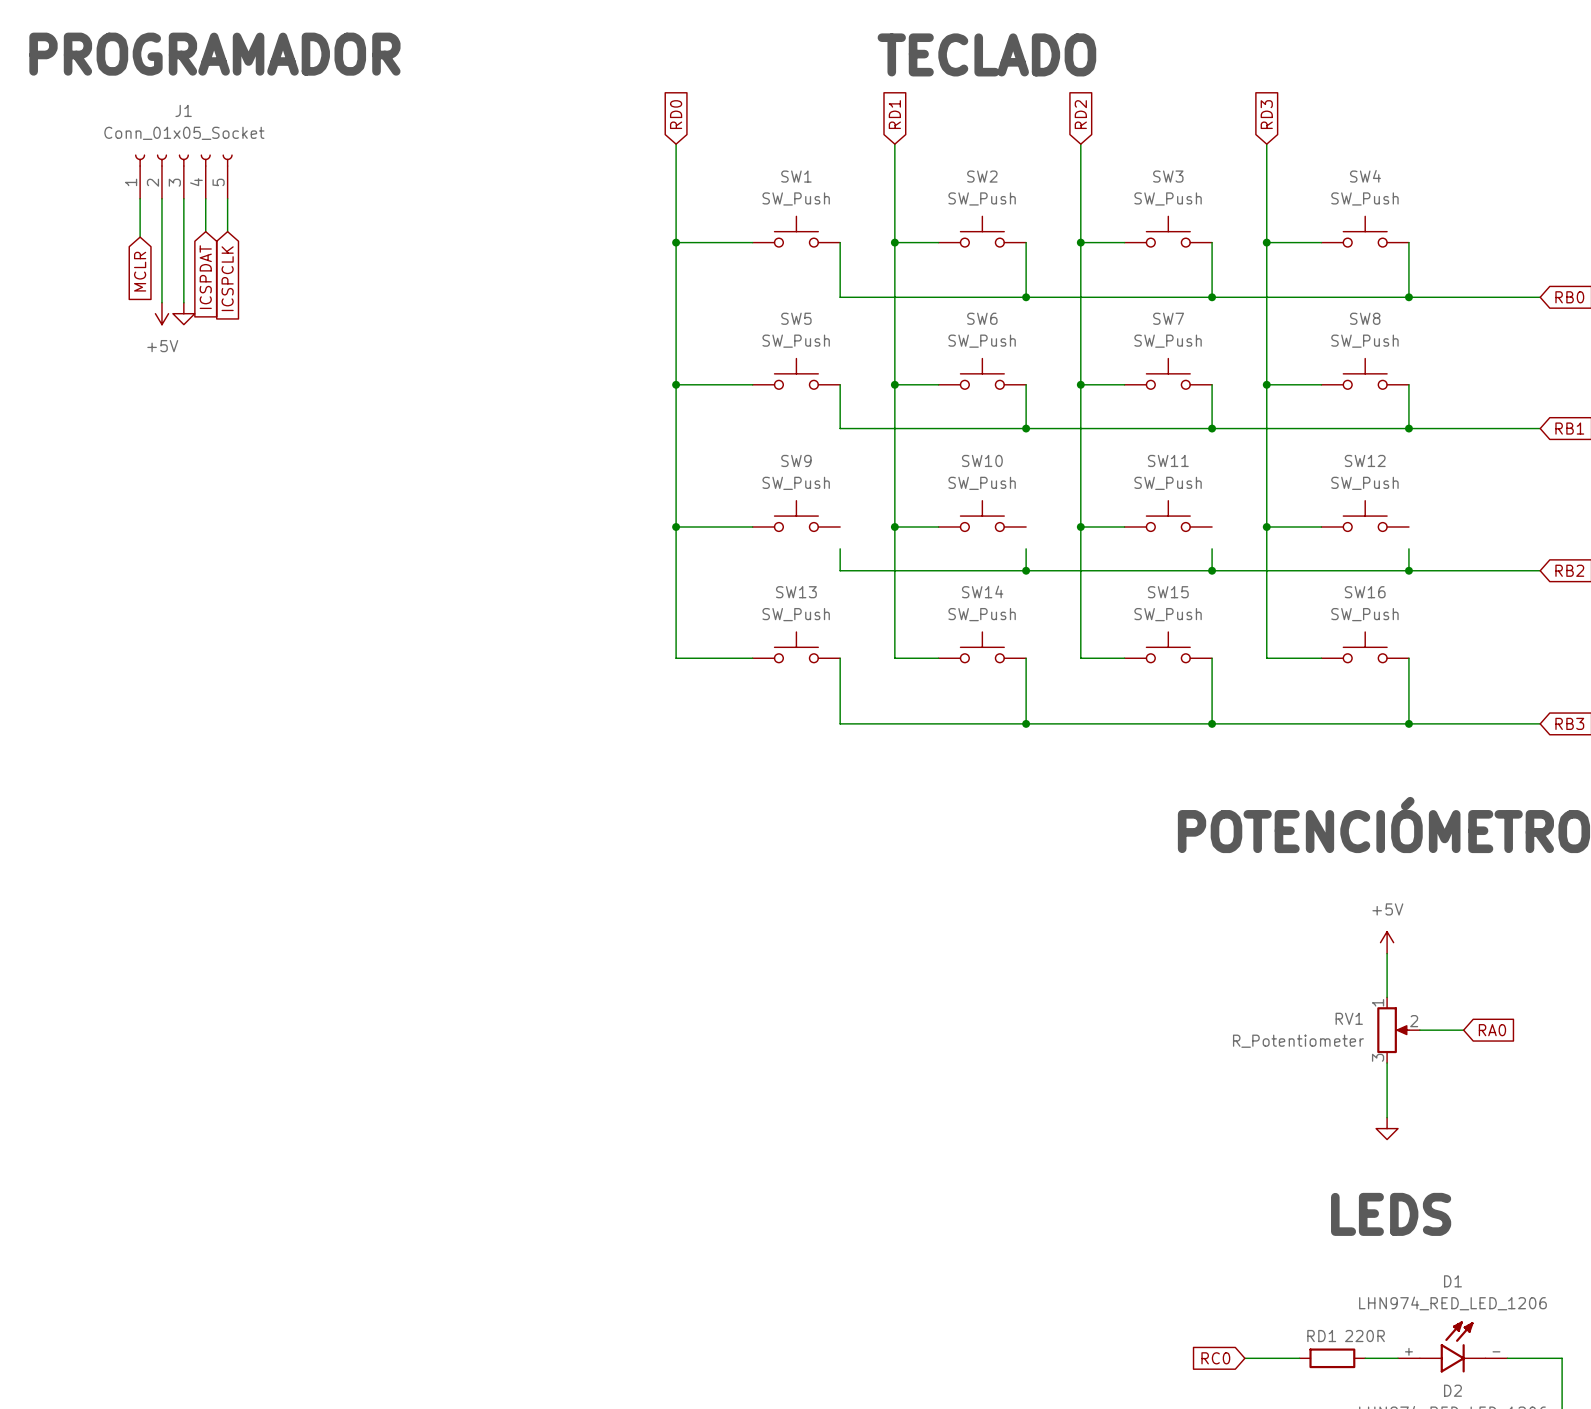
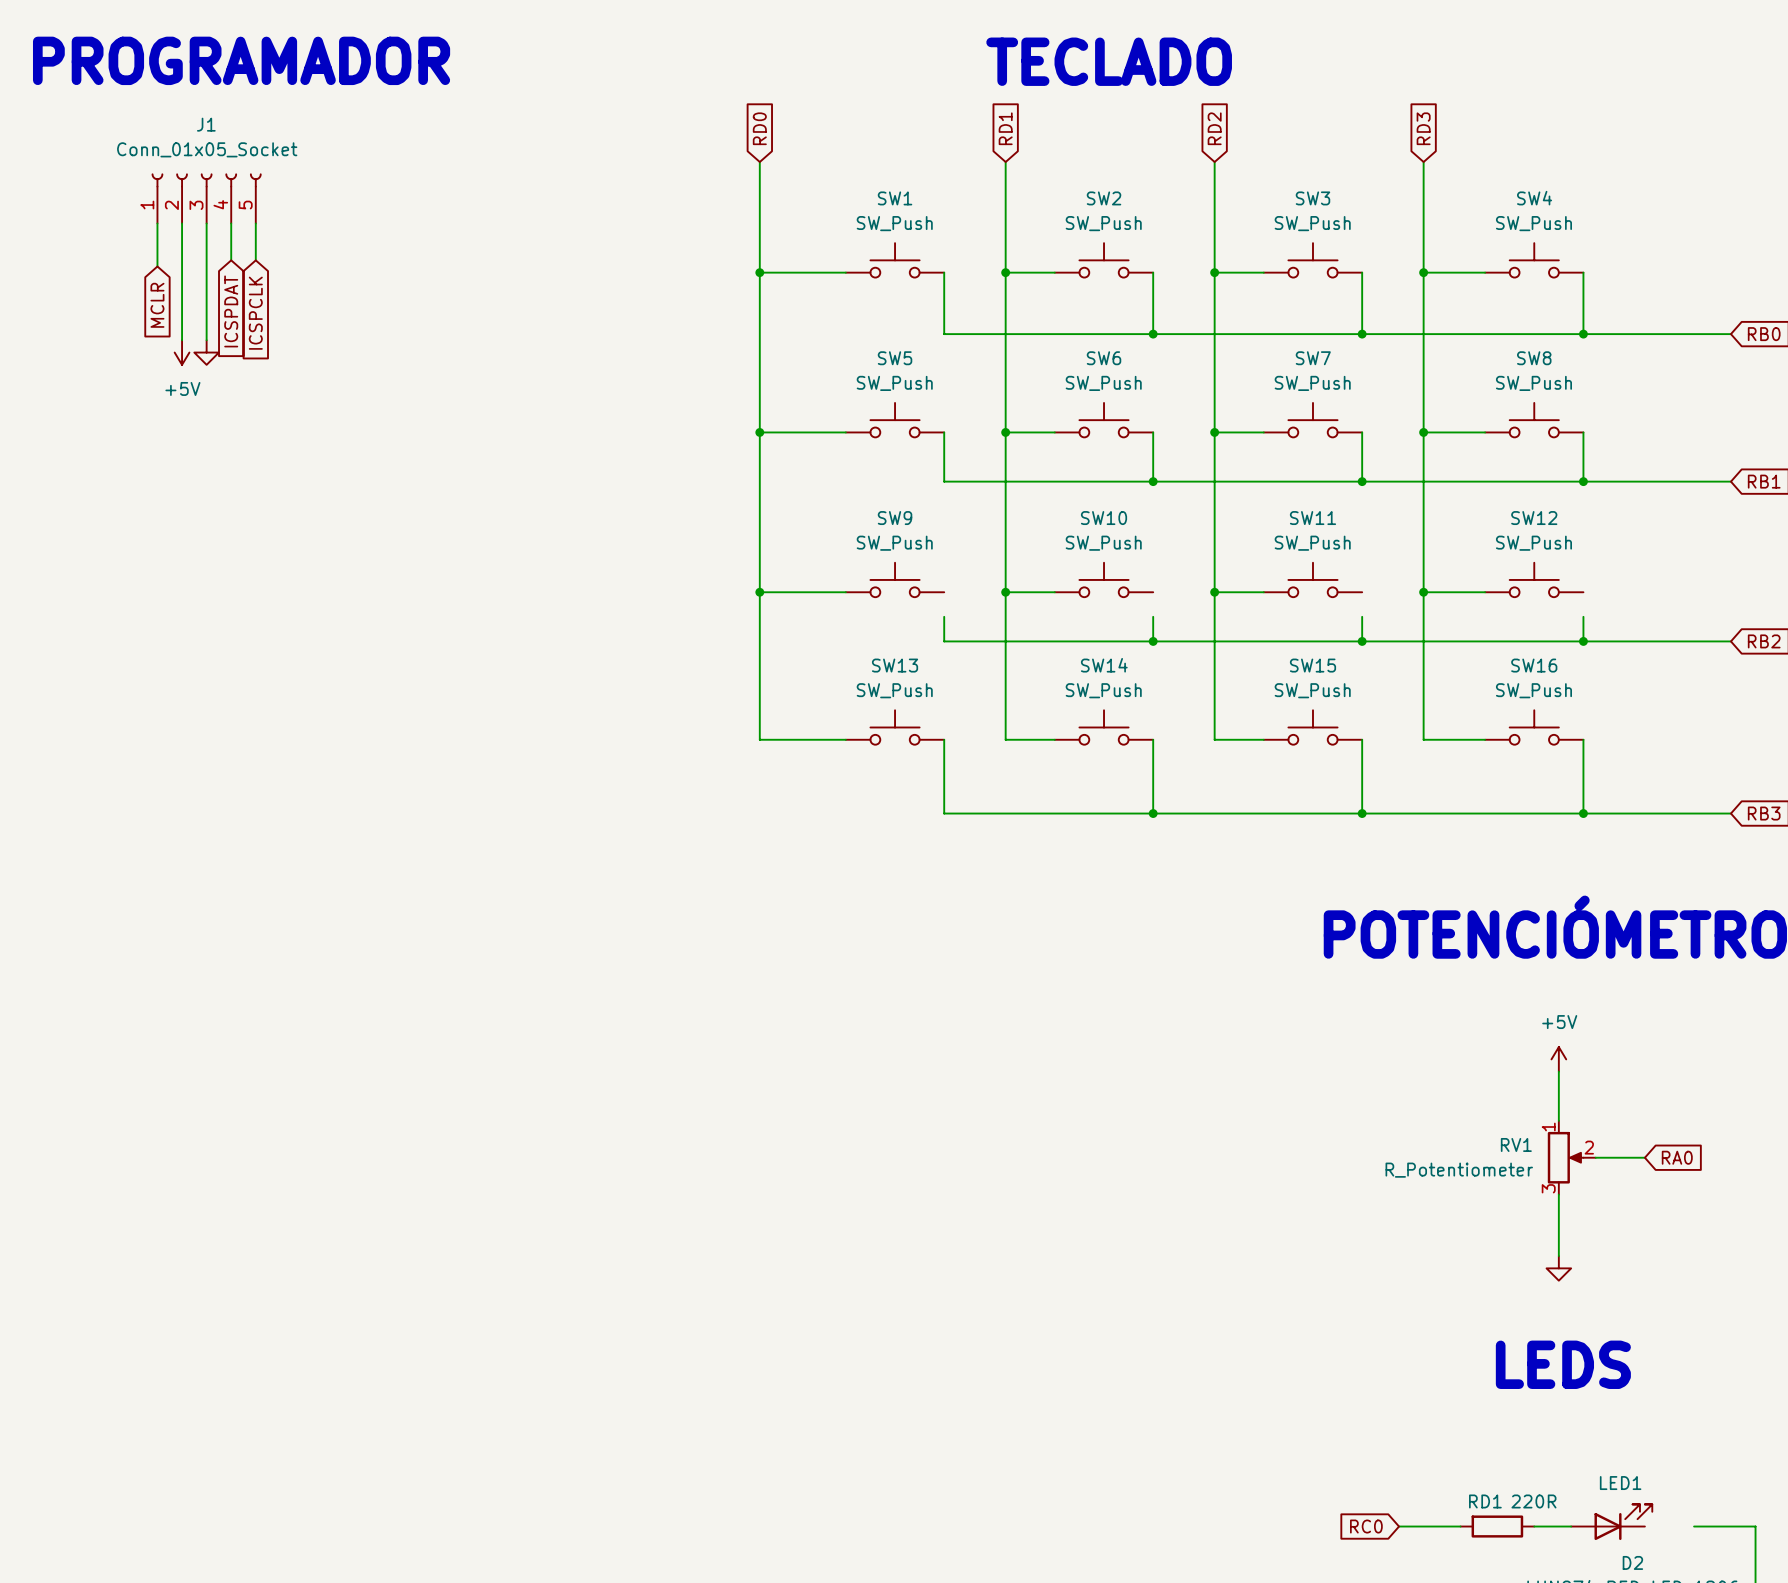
D1: LHN974_RED_LED_1206 (1452, 1346) -> none
LED1: none -> (1611, 1522)

